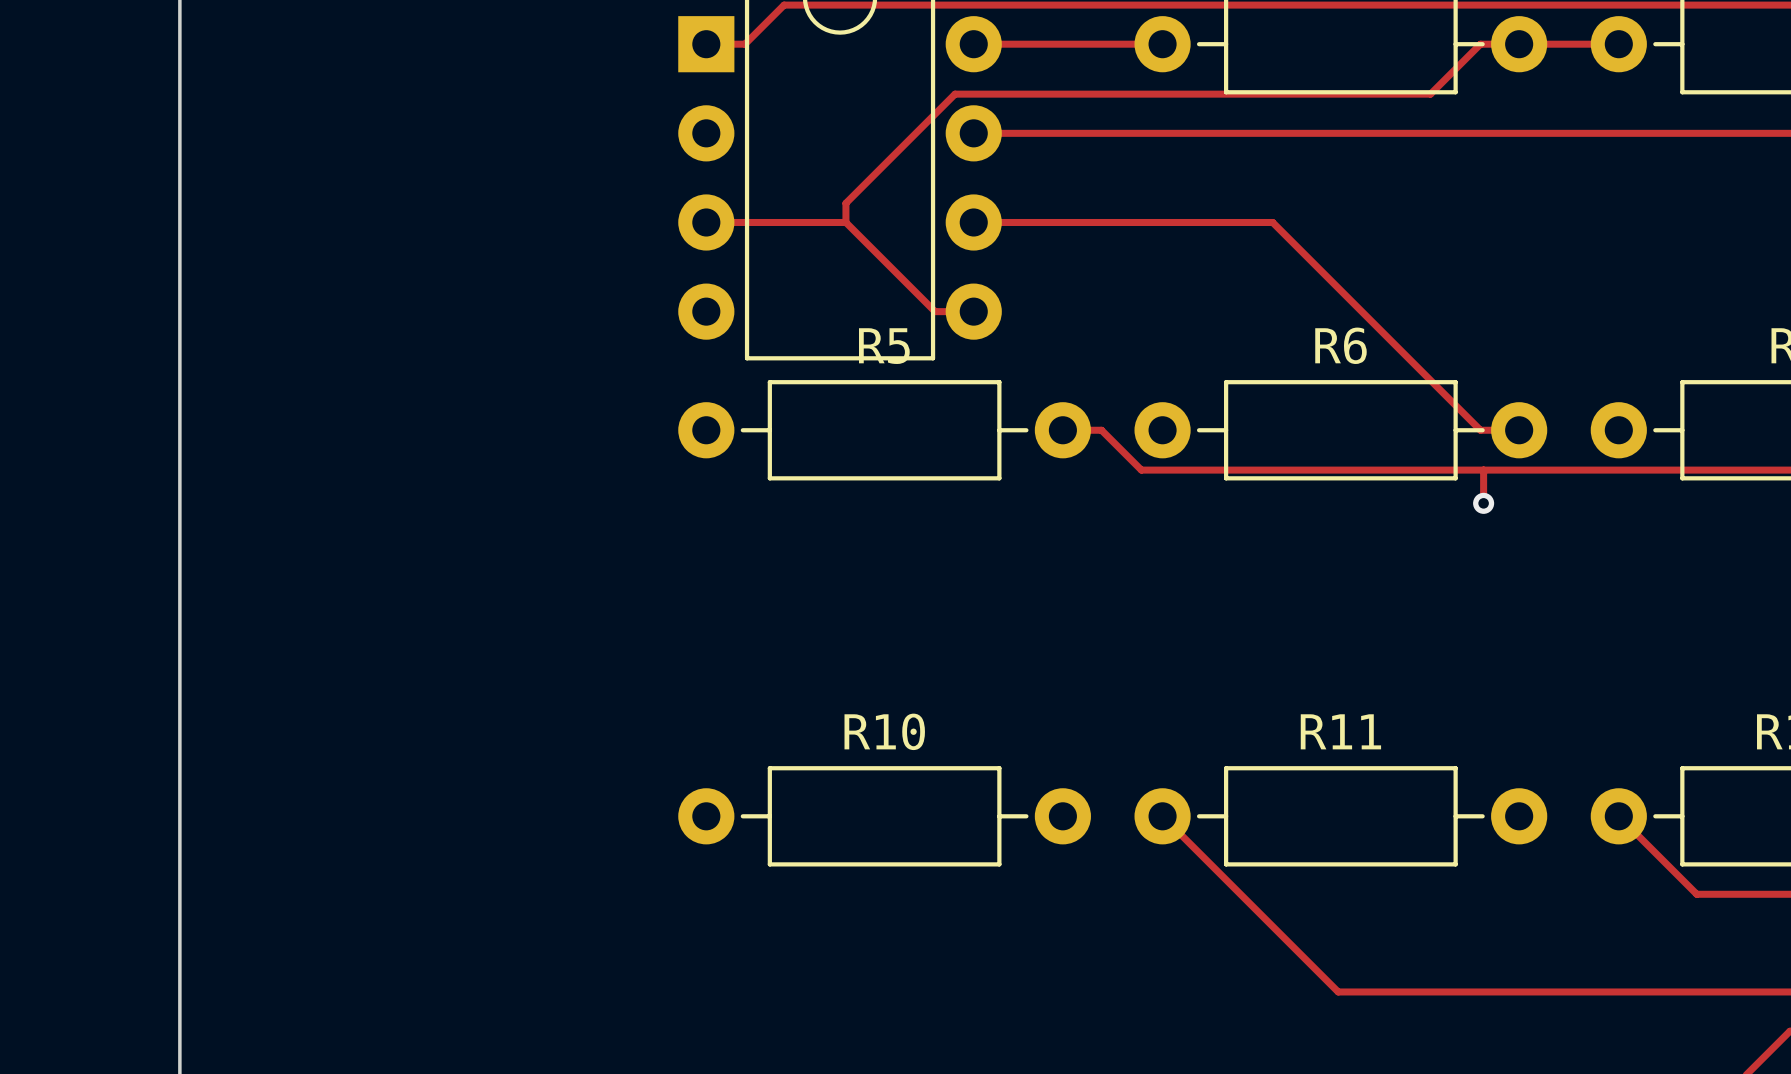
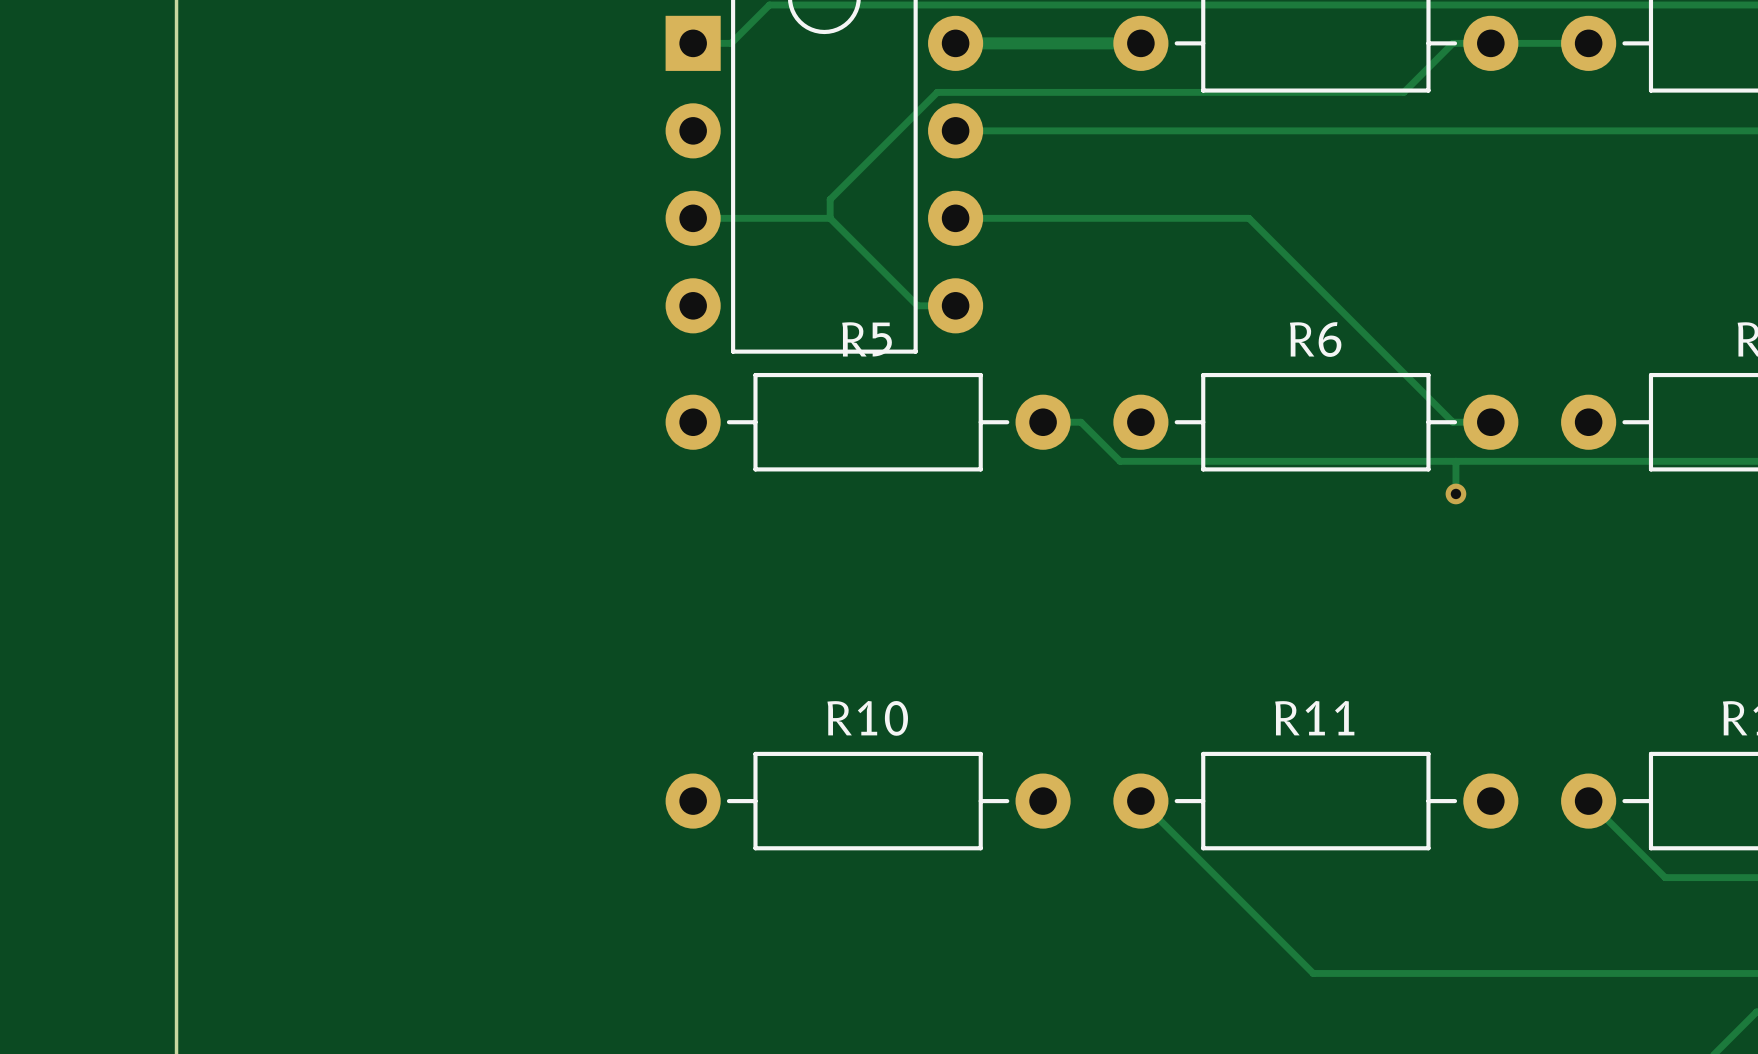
track width: thin (973, 44) (1162, 44) -> thick (955, 43) (1140, 43)

